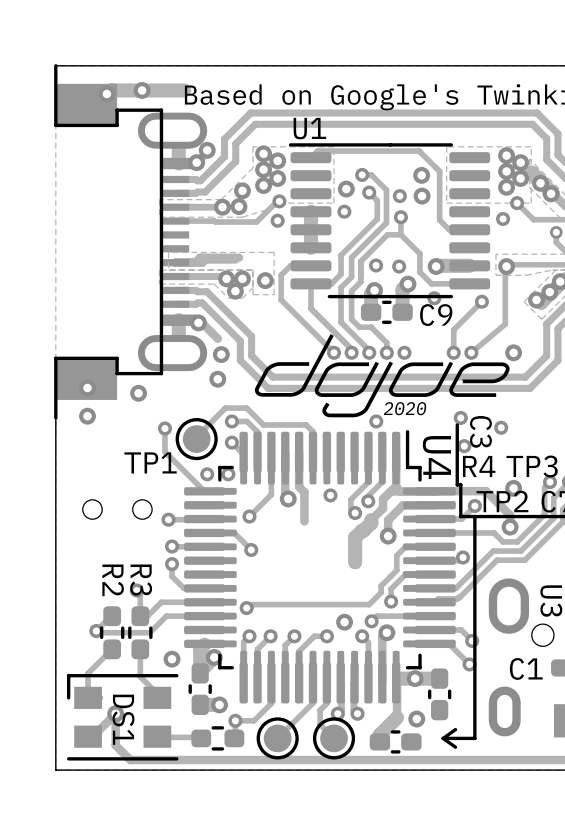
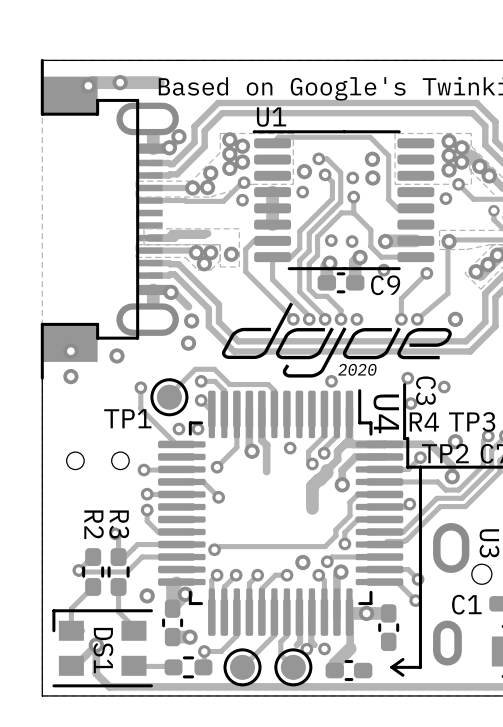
via: (337, 713) -> none
via: (357, 713) -> none
via: none -> (324, 648)
via: none -> (306, 649)
via: (416, 719) -> none

